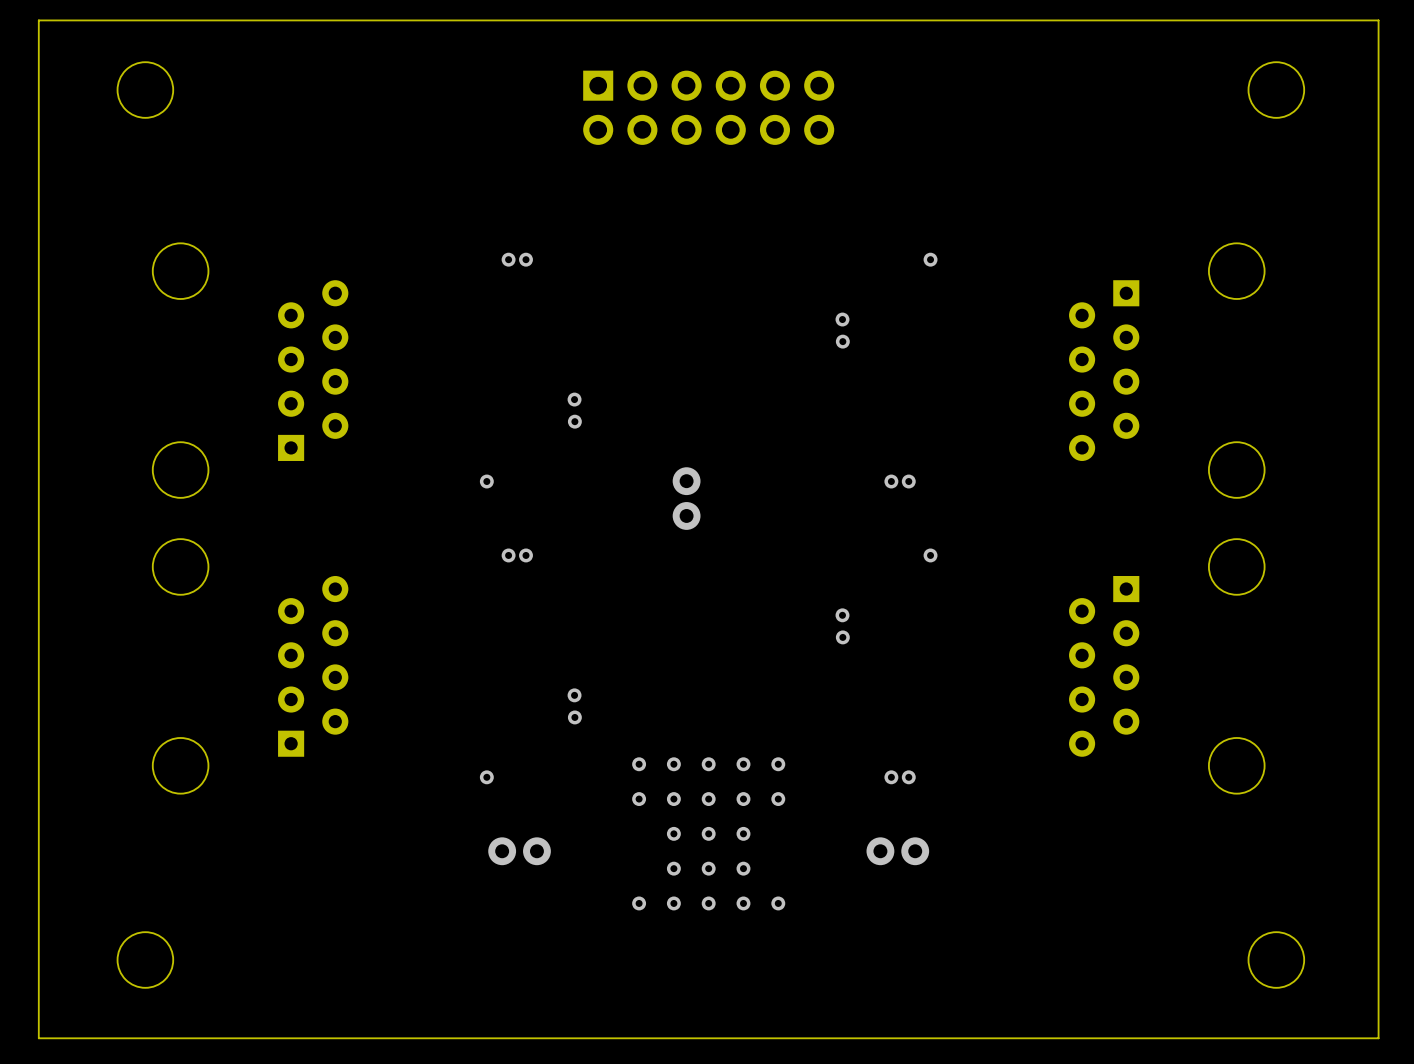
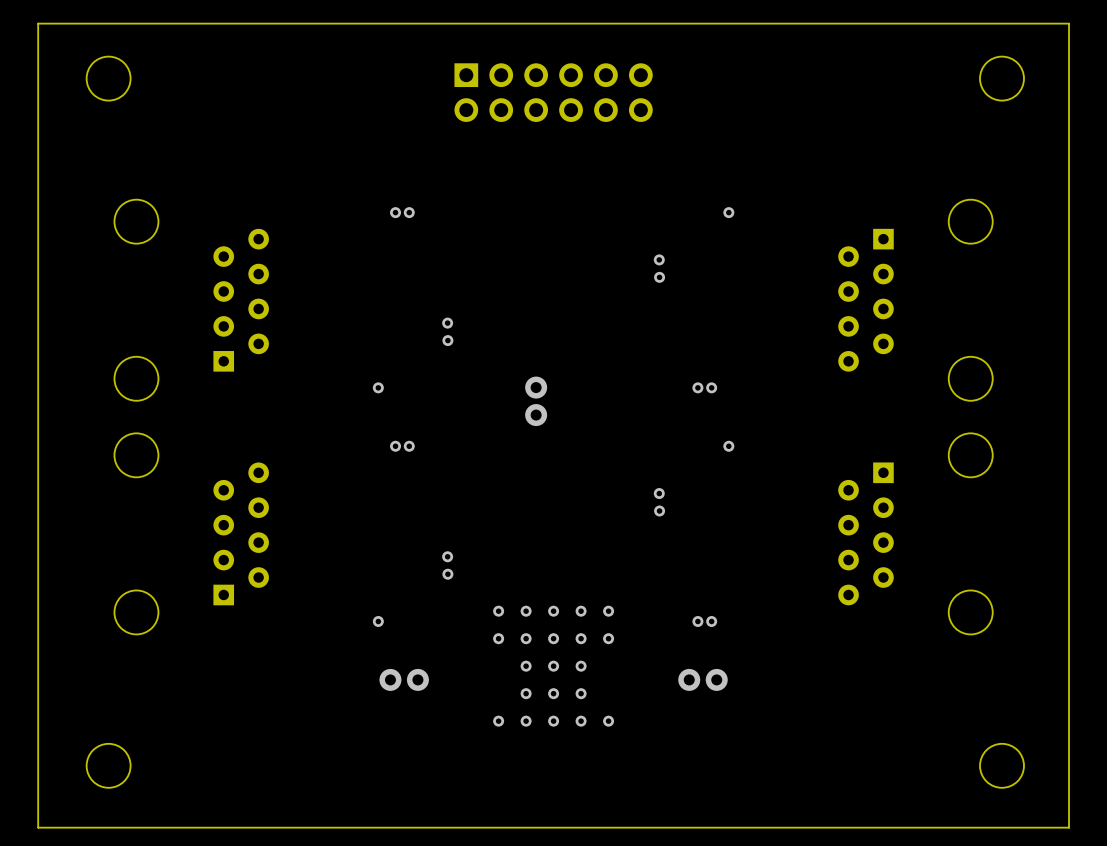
board edge: (56, 20) (38, 20) (38, 1038) (56, 1038) -> (38, 23) (38, 827)
board edge: (1361, 20) (1378, 20) (1378, 1038) (1361, 1038) -> (1069, 23) (1069, 827)

